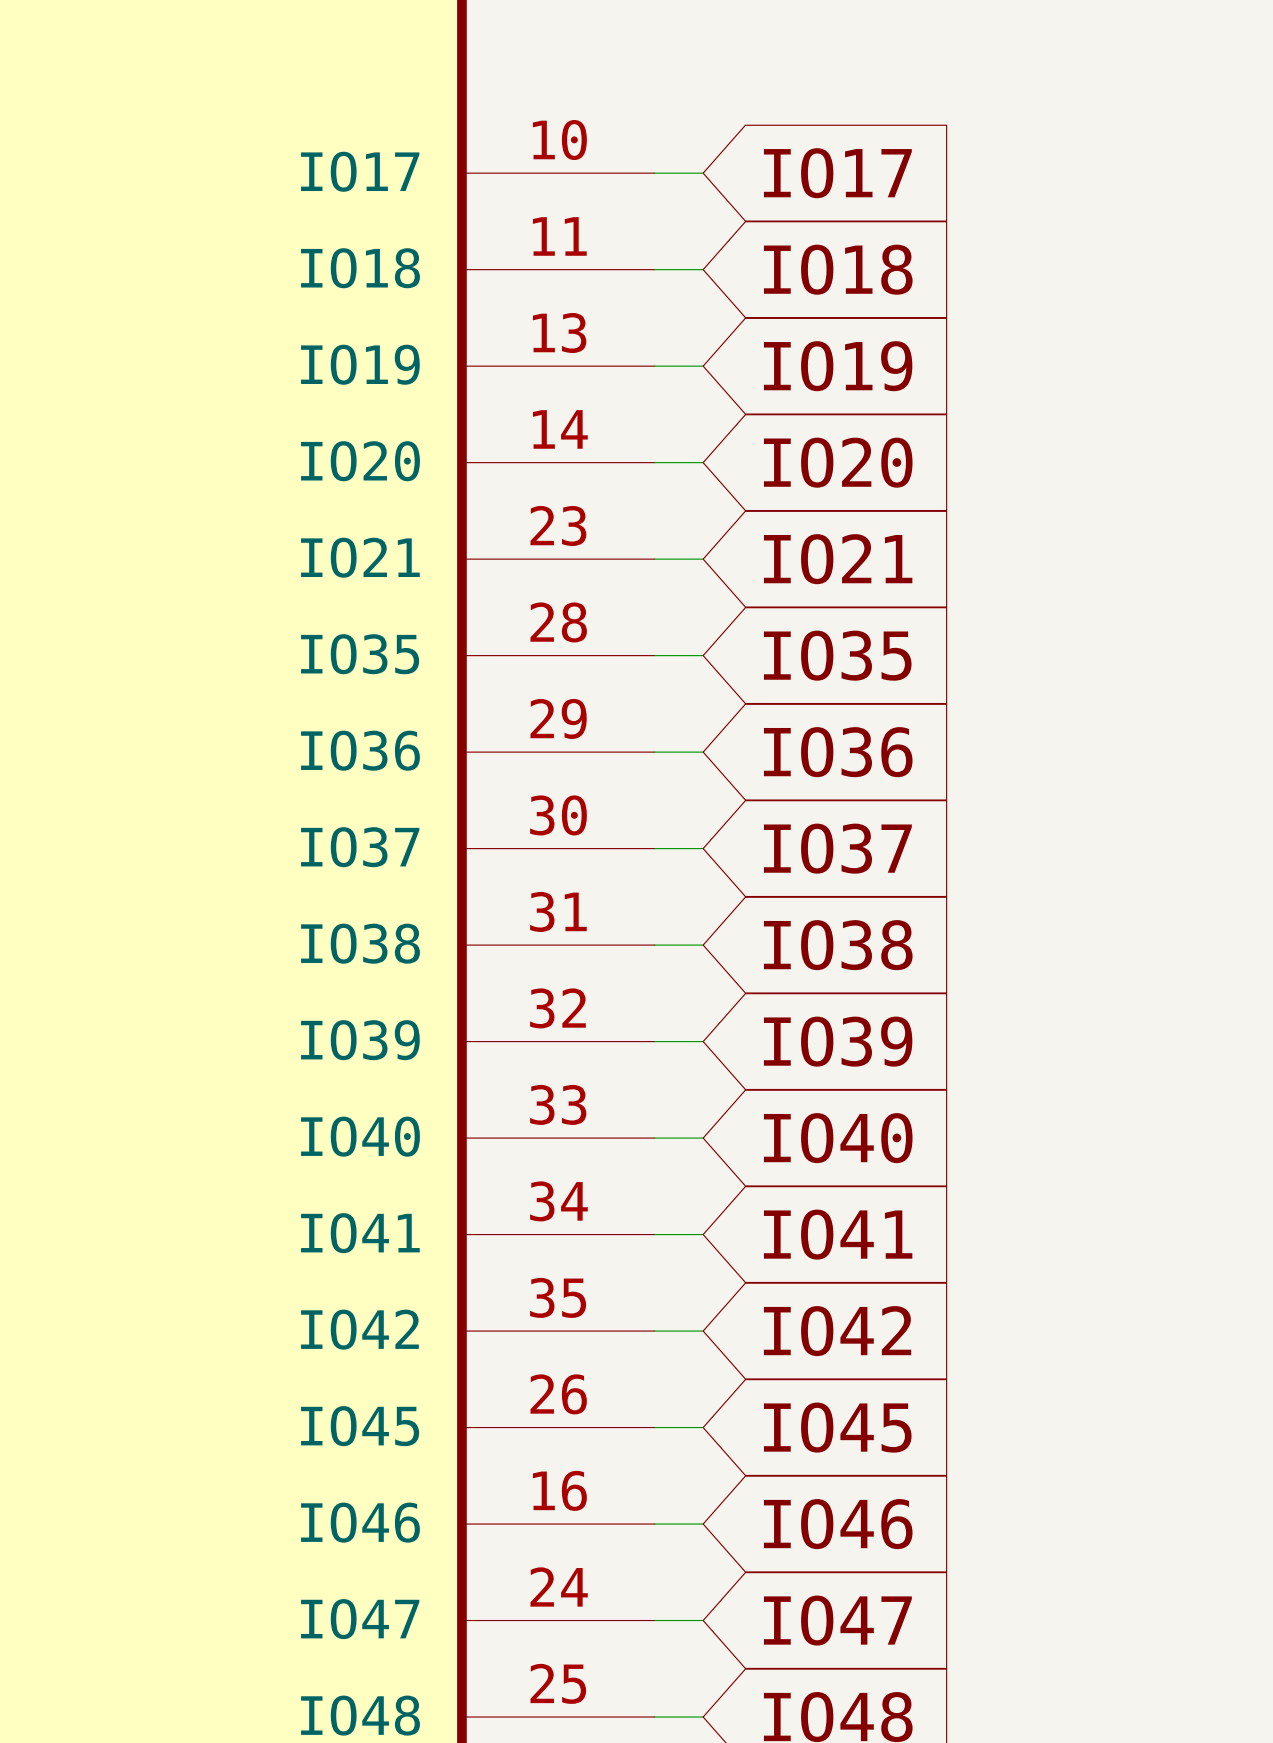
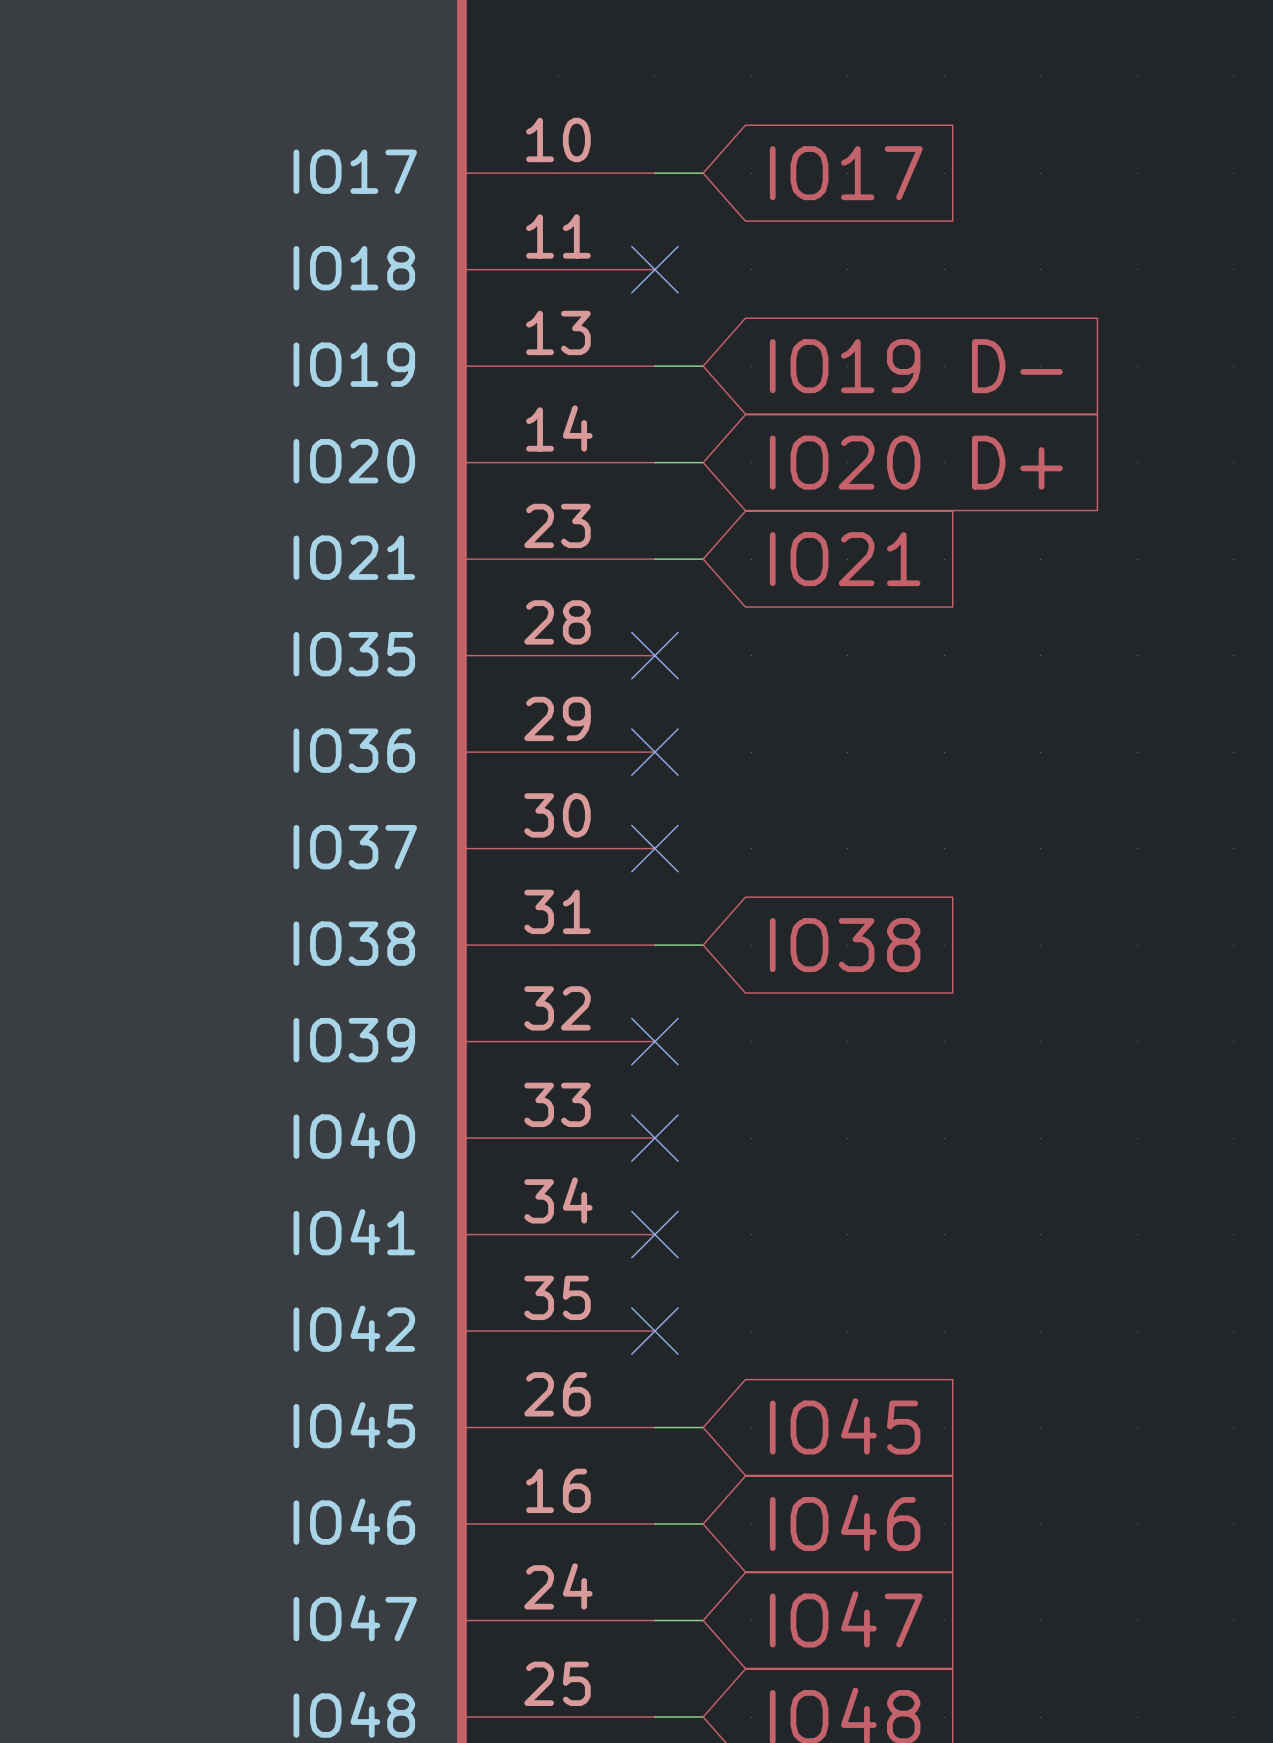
wire: (654, 269) (703, 269) -> none
no-connect mark: none -> (654, 269)
global label: IO18 (838, 269) -> none
global label: IO19 (838, 366) -> IO19 D- (916, 366)
global label: IO20 (838, 462) -> IO20 D+ (916, 462)
wire: (654, 655) (703, 655) -> none
no-connect mark: none -> (654, 655)
global label: IO35 (837, 655) -> none
wire: (654, 752) (703, 752) -> none
no-connect mark: none -> (654, 752)
global label: IO36 (838, 752) -> none
wire: (654, 848) (703, 848) -> none
no-connect mark: none -> (654, 848)
global label: IO37 (837, 848) -> none
wire: (654, 1041) (703, 1041) -> none
no-connect mark: none -> (654, 1041)
global label: IO39 (838, 1041) -> none
wire: (654, 1138) (703, 1138) -> none
no-connect mark: none -> (654, 1138)
global label: IO40 (838, 1138) -> none
wire: (654, 1234) (703, 1234) -> none
no-connect mark: none -> (654, 1234)
global label: IO41 (838, 1234) -> none
wire: (654, 1331) (703, 1331) -> none
no-connect mark: none -> (654, 1331)
global label: IO42 (837, 1331) -> none

